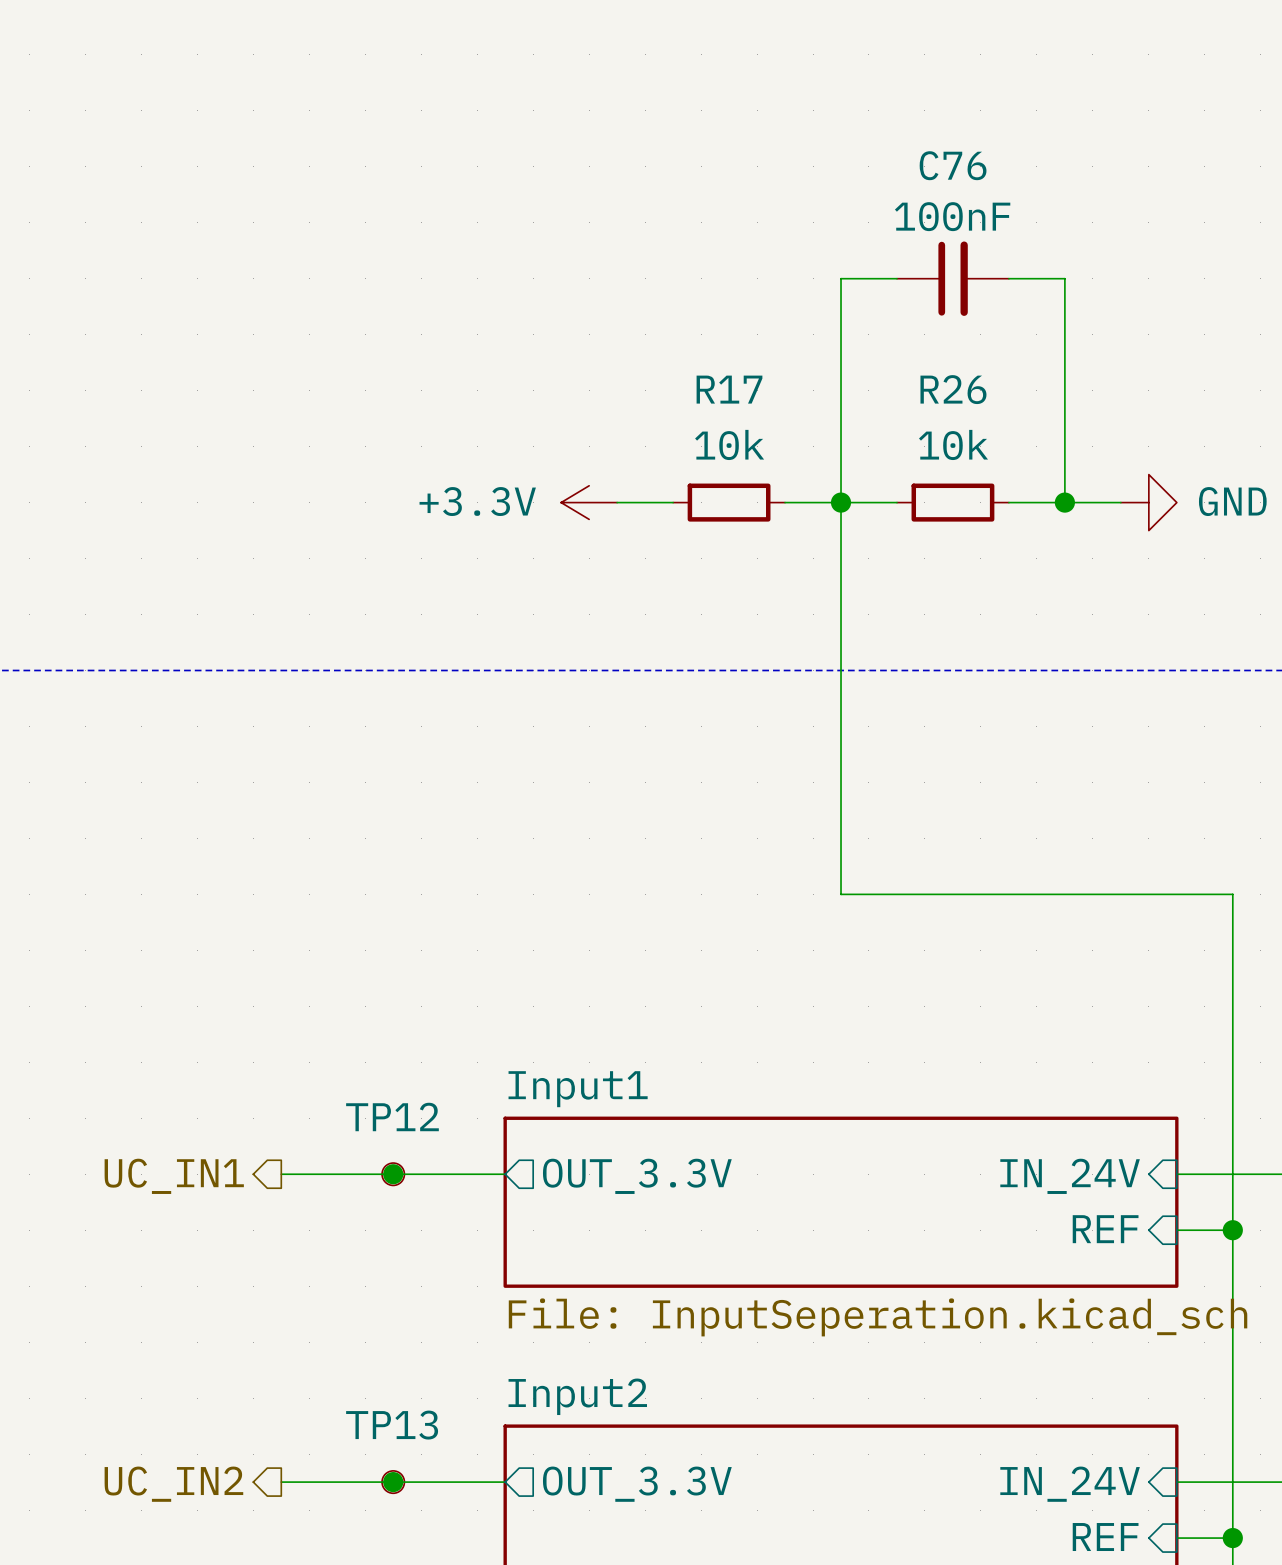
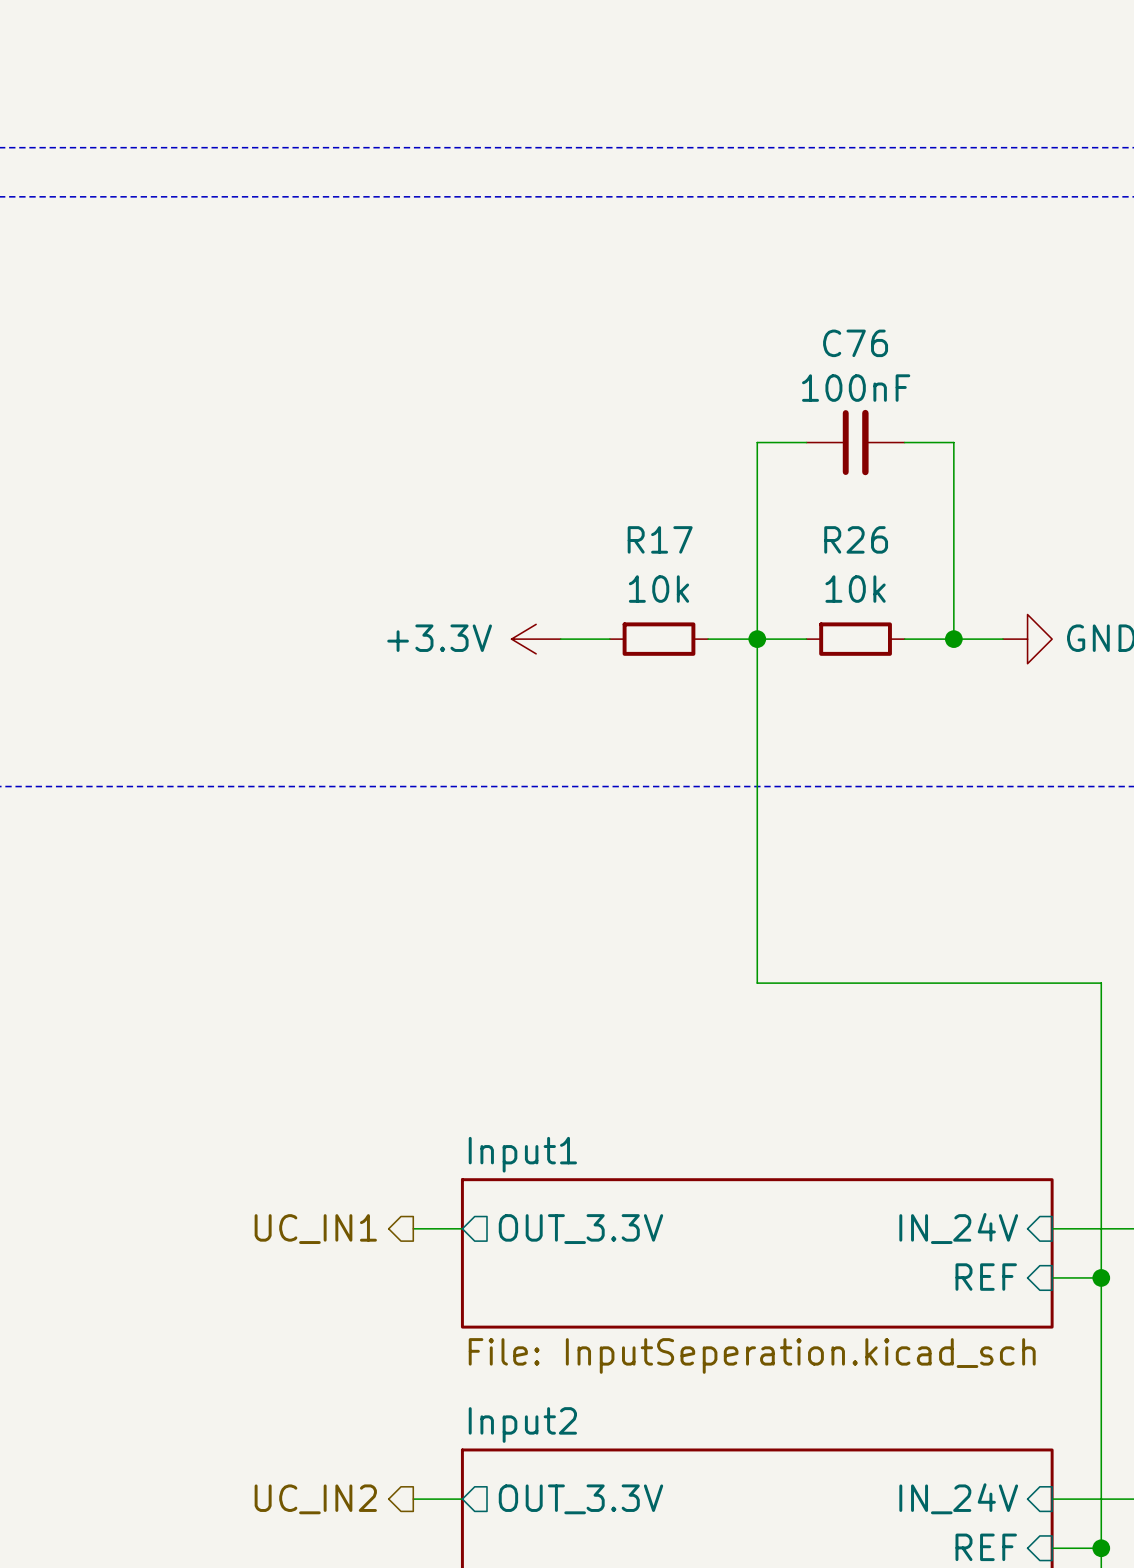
wire: (281, 1174) (449, 1174) -> none
junction: (393, 1174) -> none
TP12: (393, 1174) -> none
hierarchical label position: UC_IN1 (174, 1176) -> UC_IN1 (315, 1229)
wire: (281, 1482) (449, 1482) -> none
junction: (393, 1482) -> none
TP13: (393, 1482) -> none
hierarchical label position: UC_IN2 (173, 1484) -> UC_IN2 (315, 1499)

